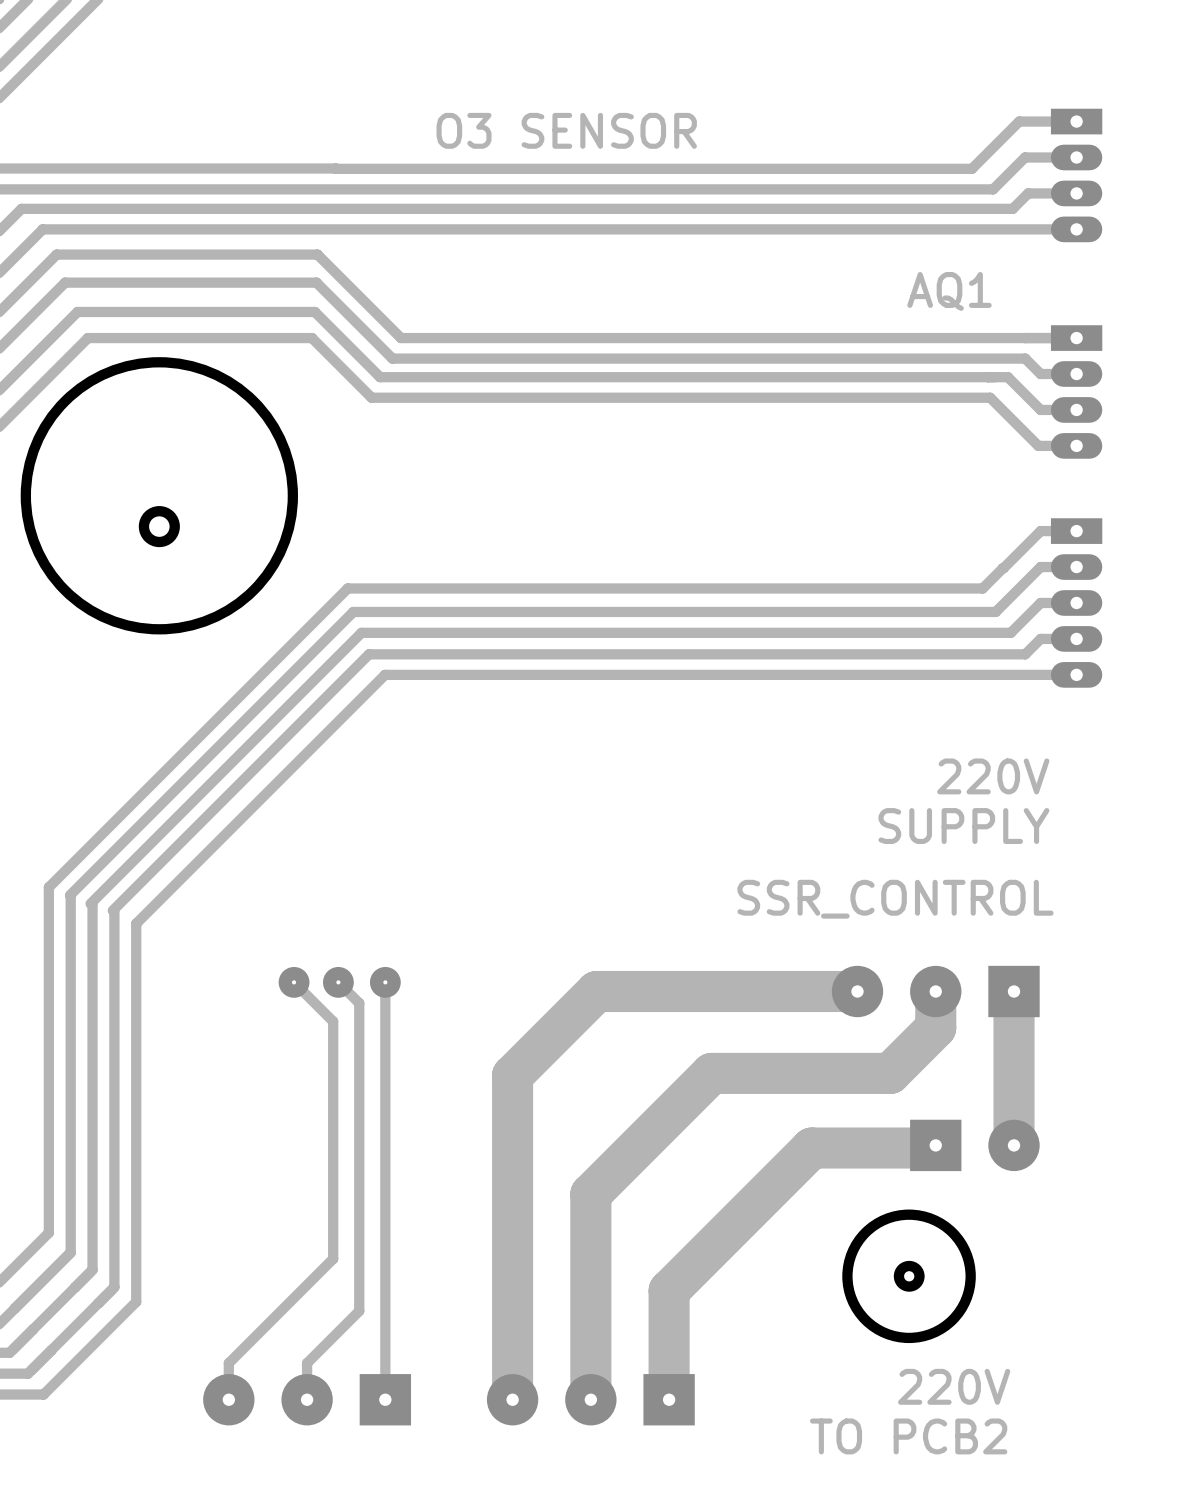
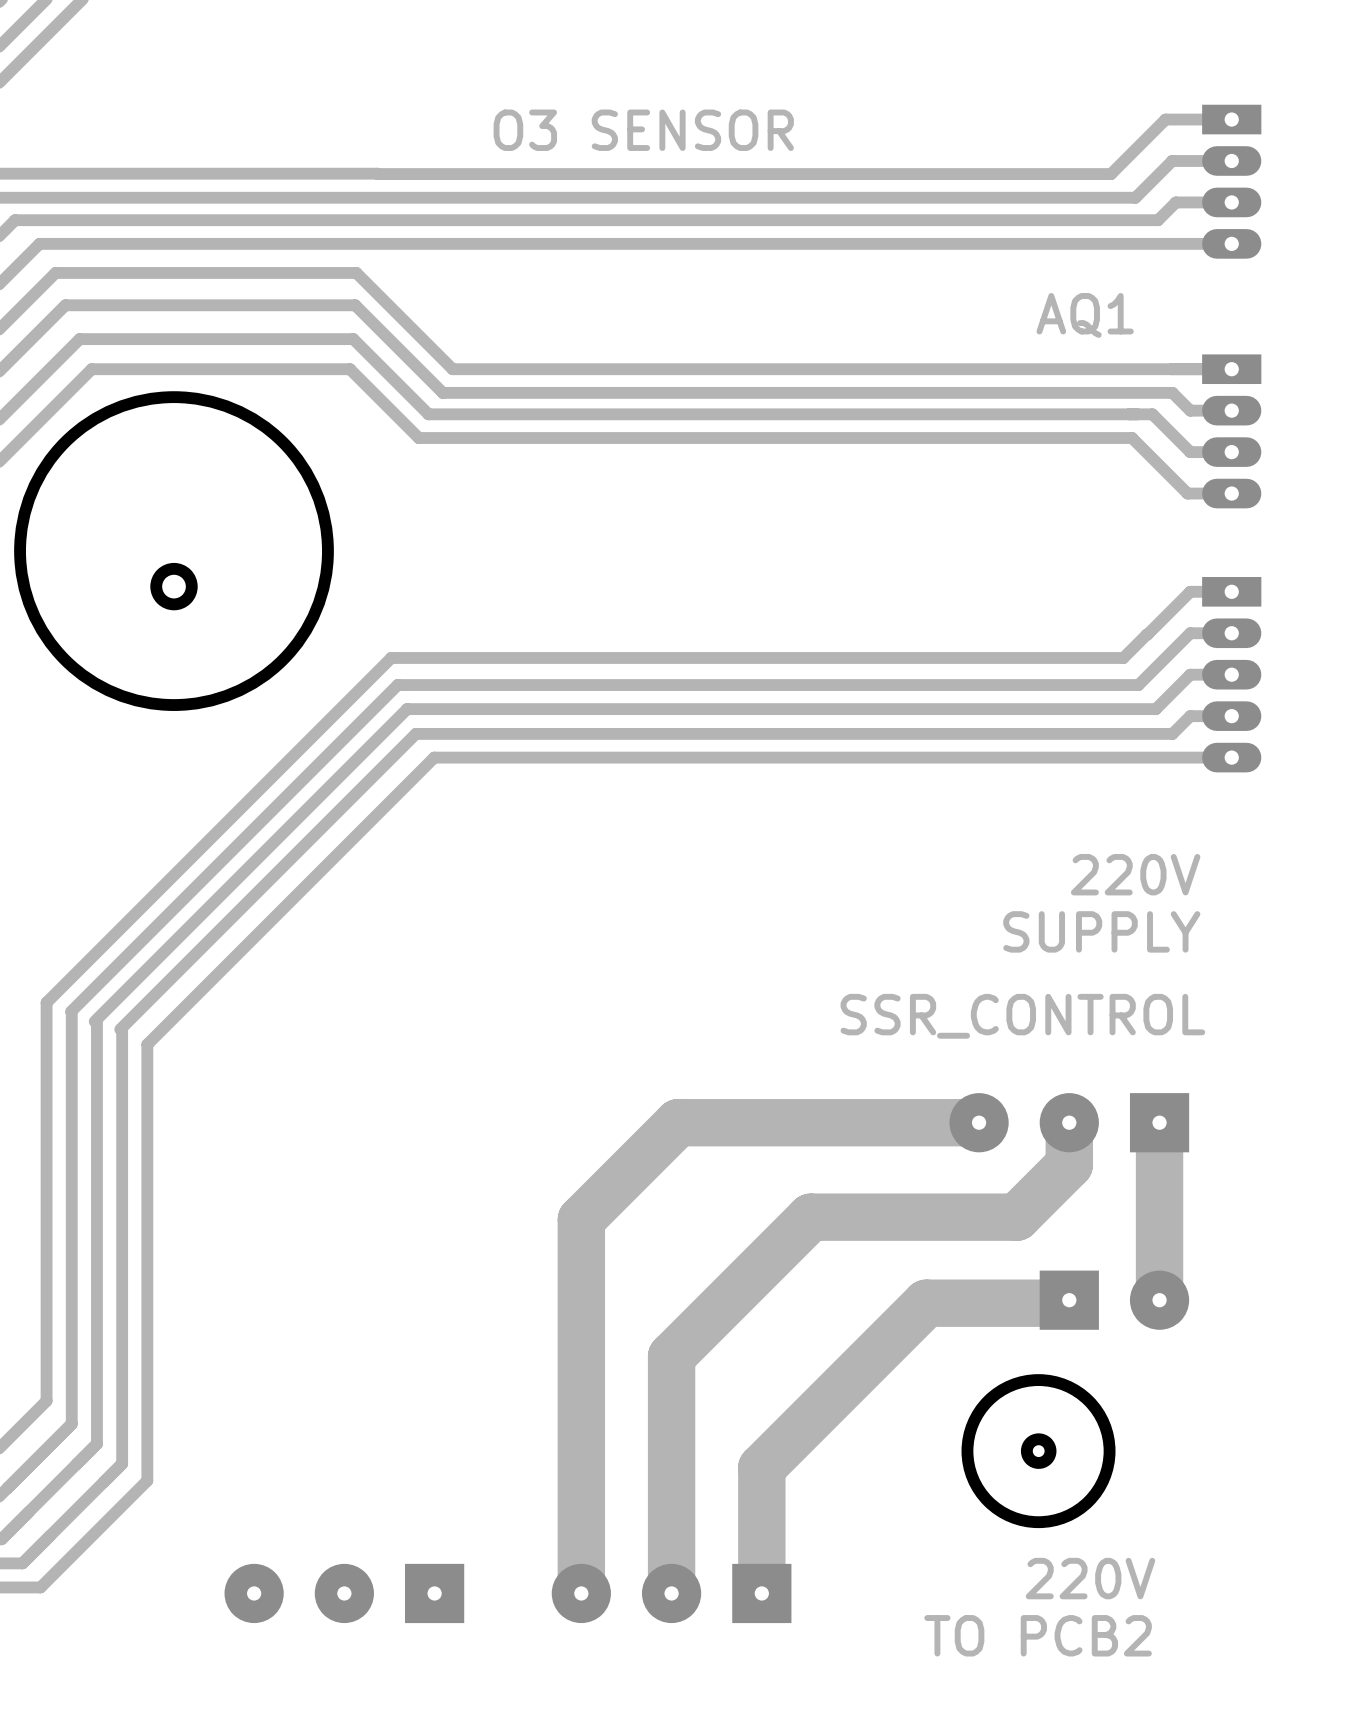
track: (294, 982) (333, 1021) (333, 1258) (228, 1363) (228, 1399) -> none
via: (294, 982) -> none
track: (338, 982) (359, 1003) (359, 1311) (307, 1363) (307, 1399) -> none
via: (338, 982) -> none
track: (385, 982) (385, 1399) -> none
via: (385, 982) -> none

